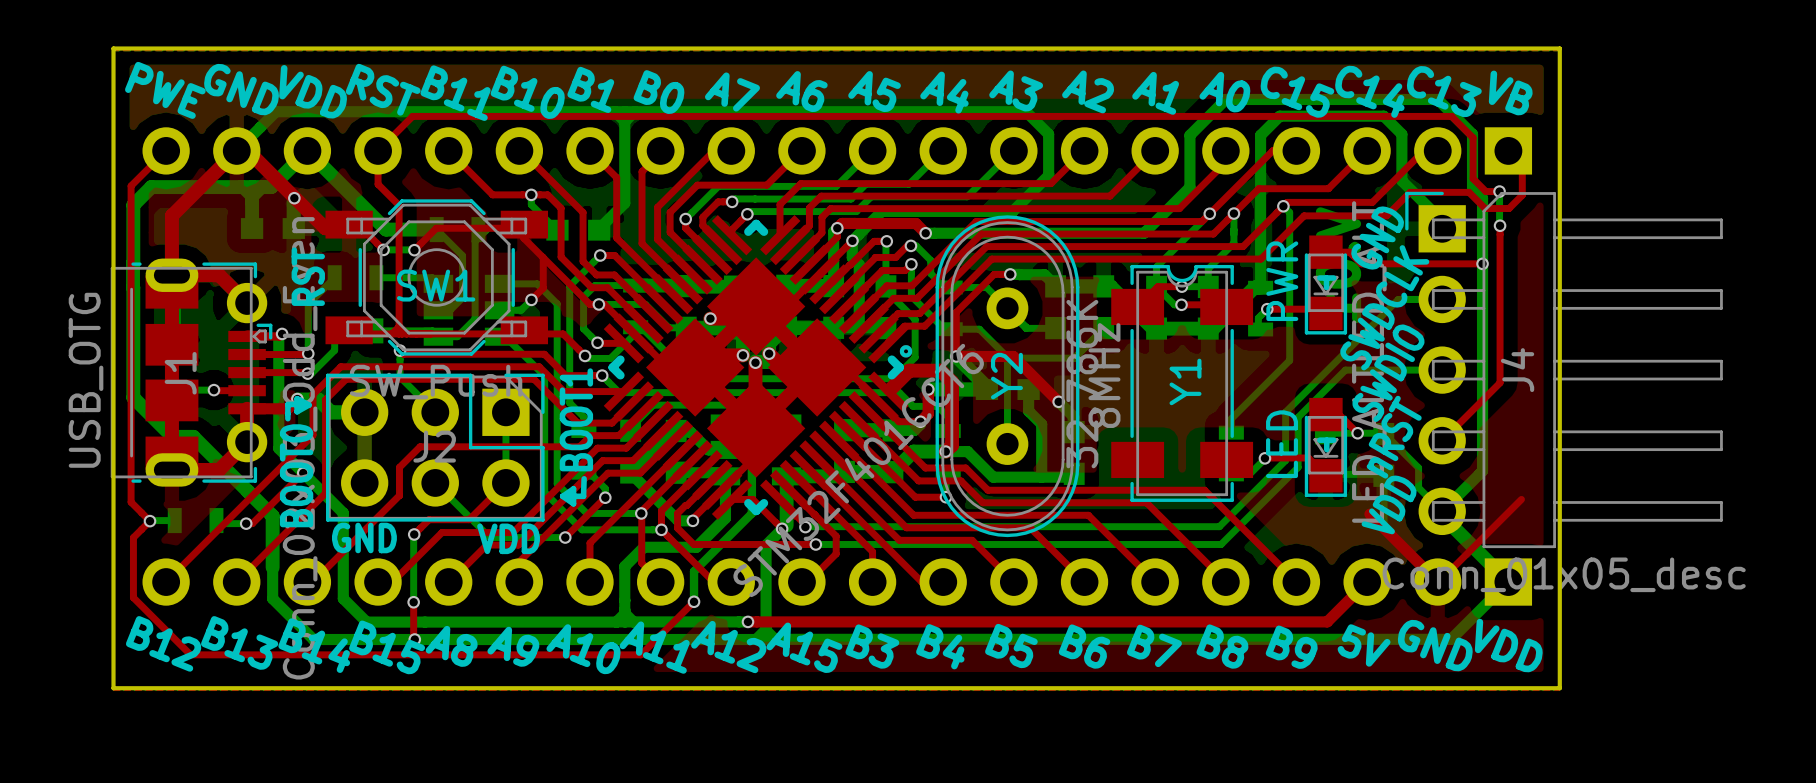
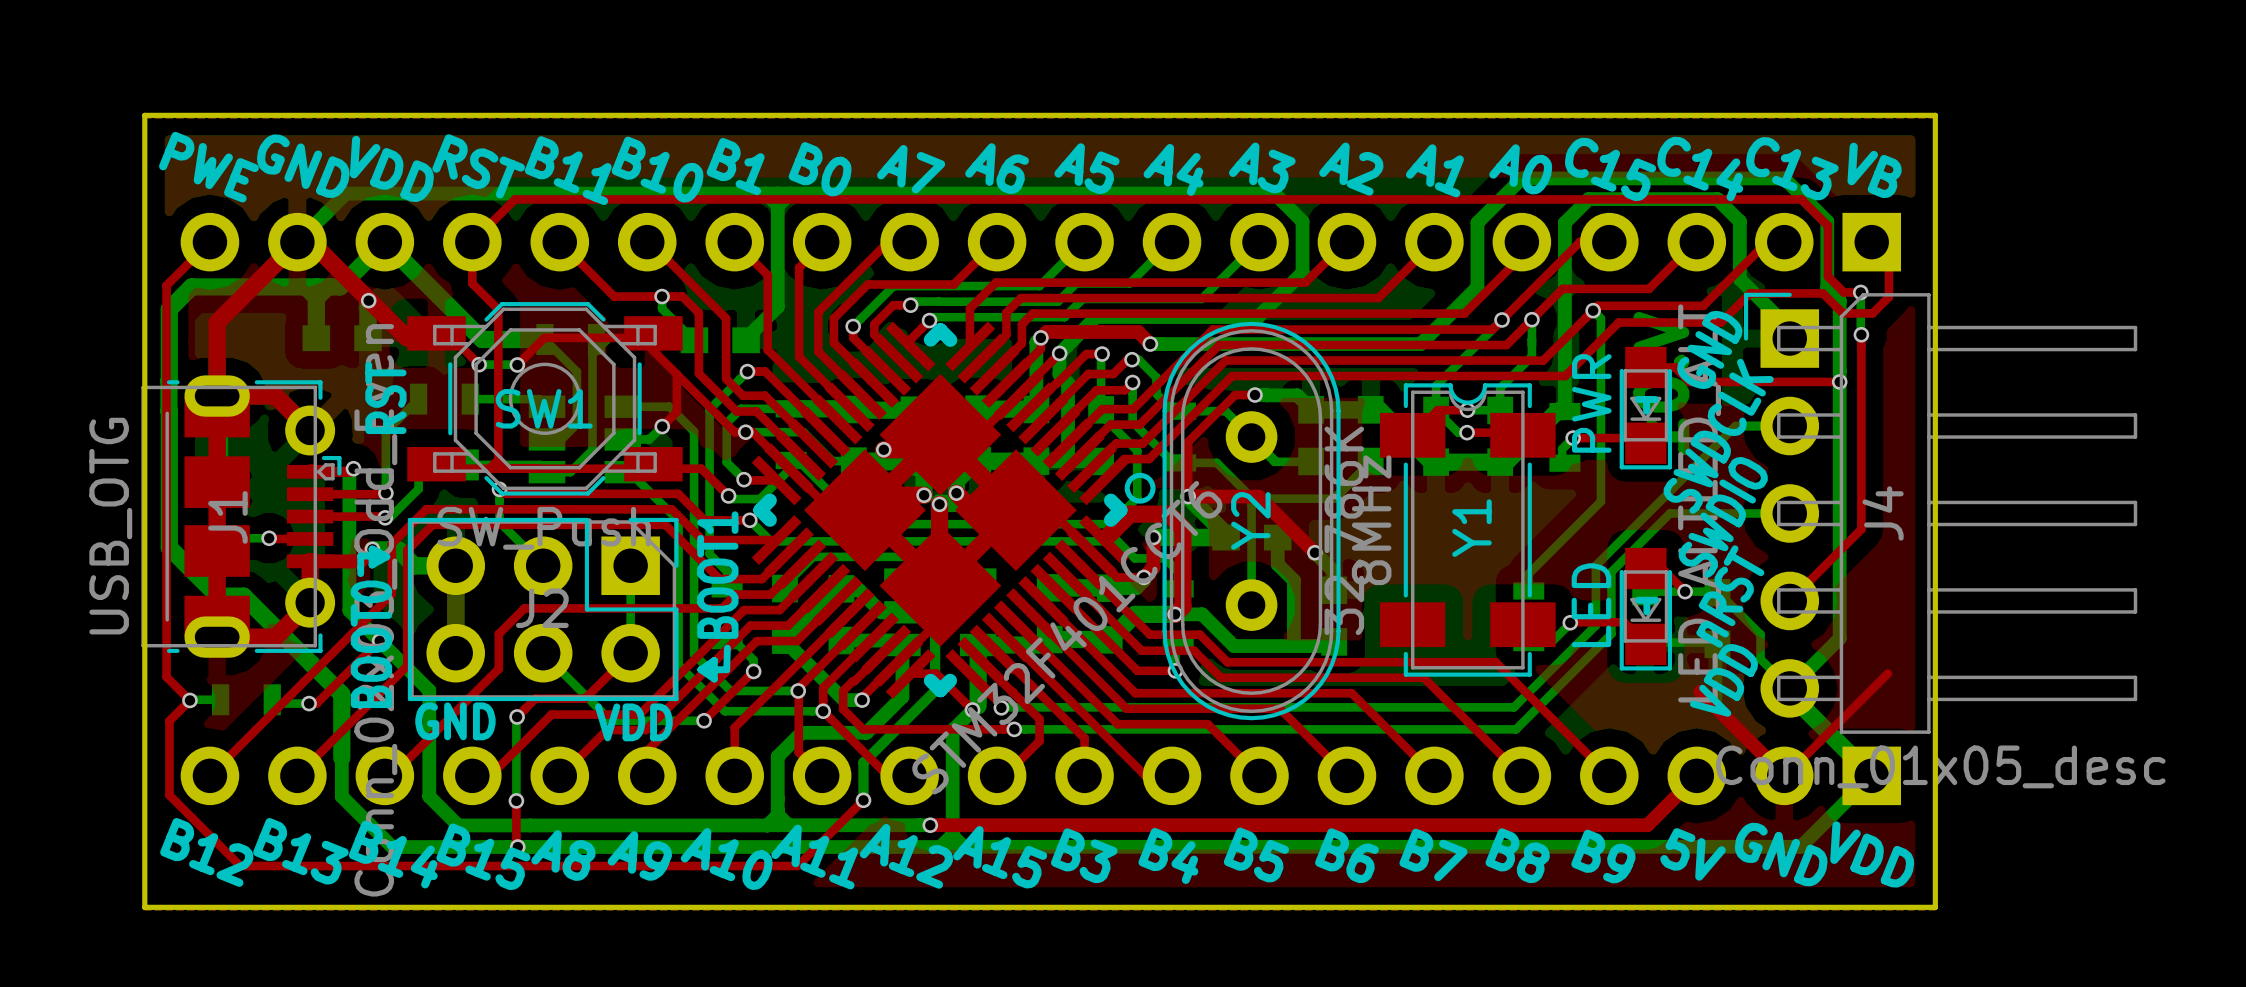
part footprint: [603, 215, 913, 520] -> [751, 321, 1156, 699]

